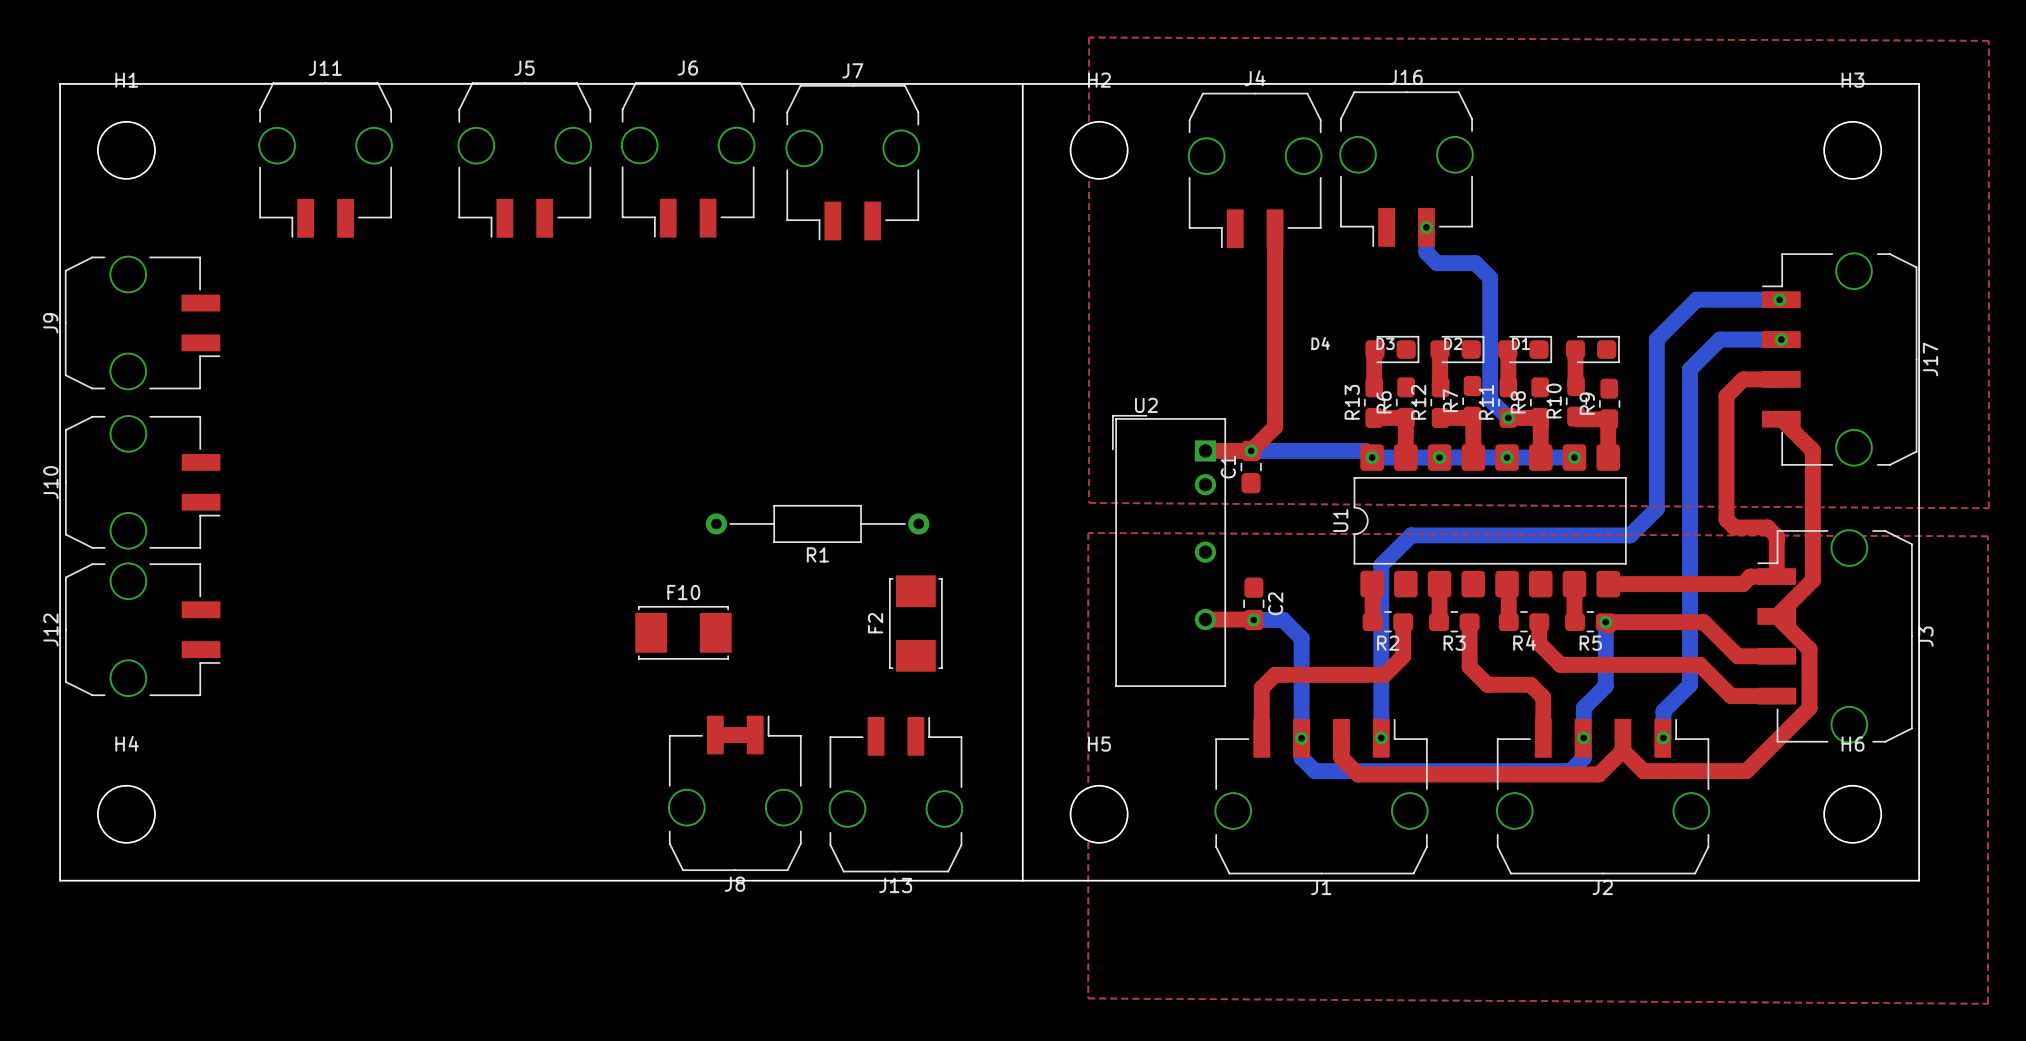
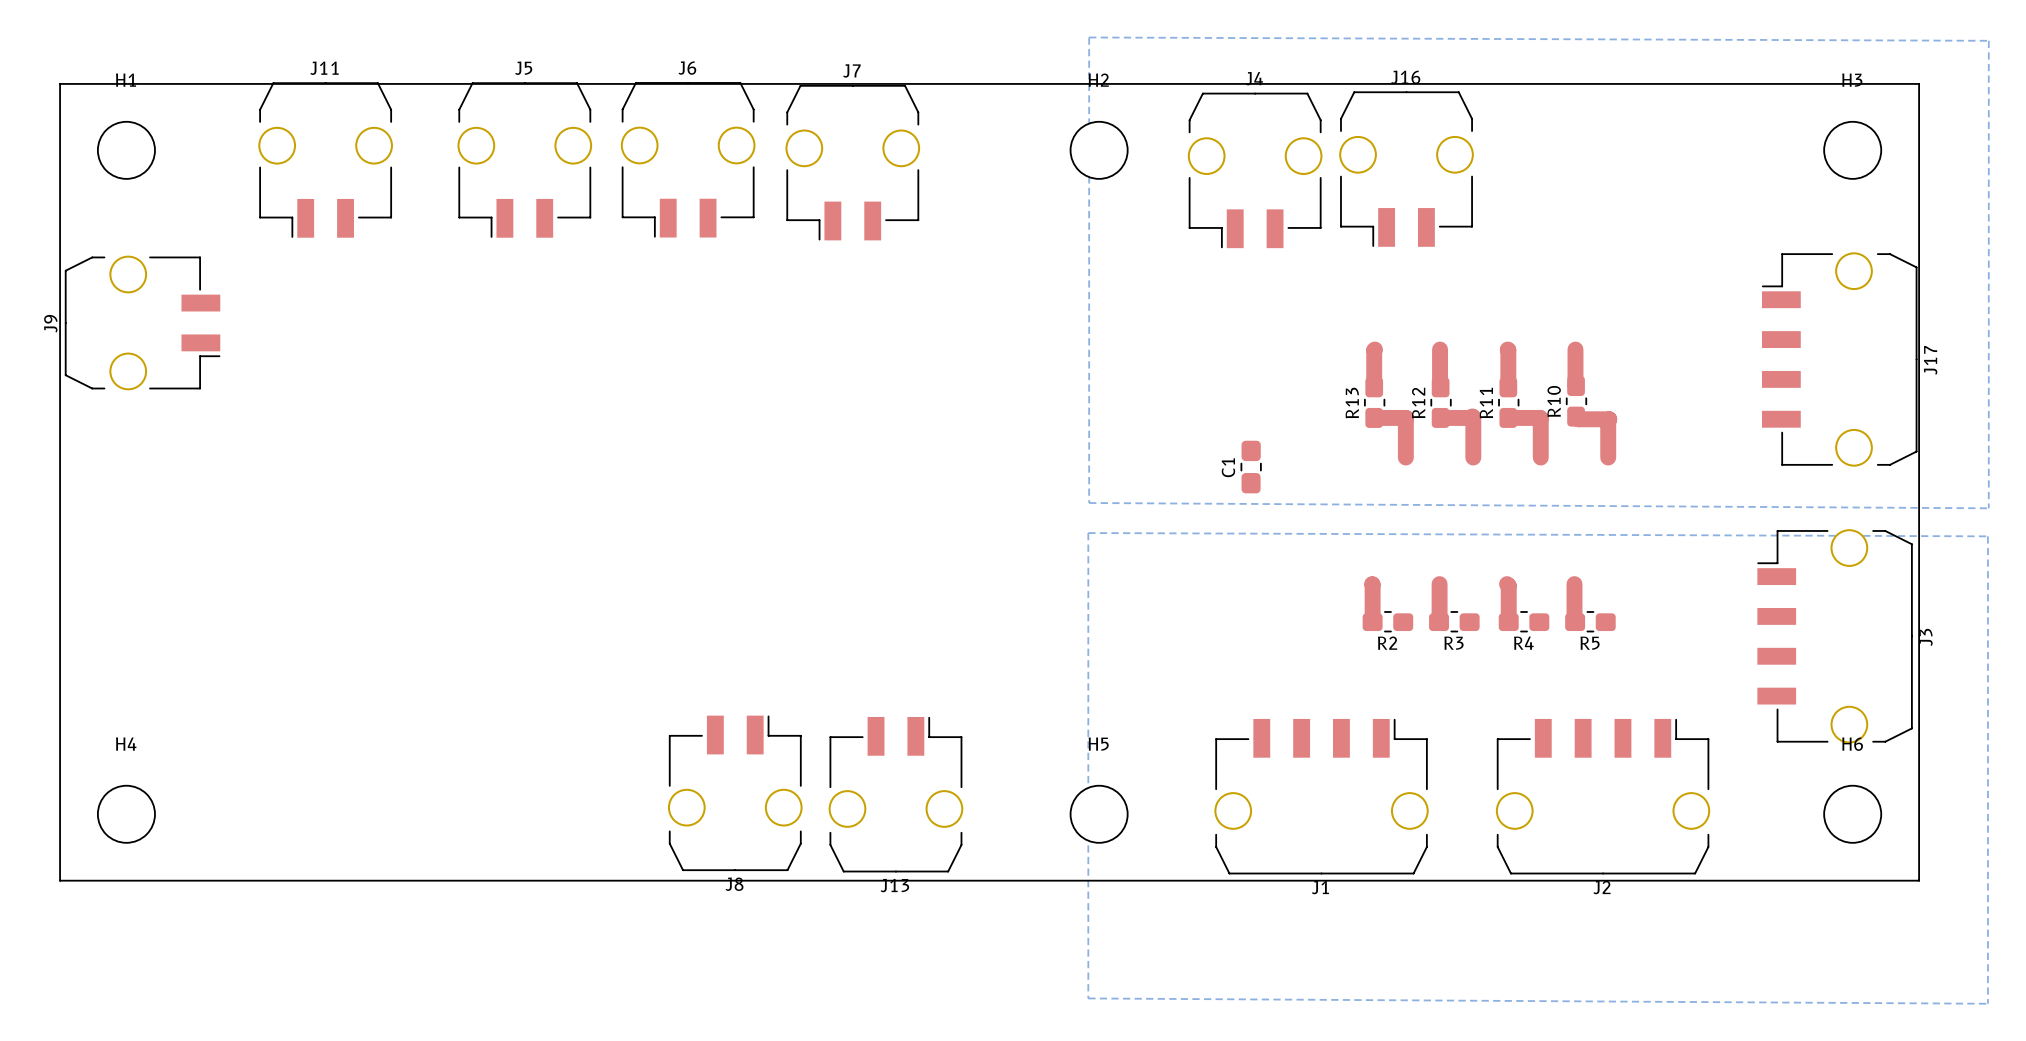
top zone outline: (1089, 37) (1988, 40) (1988, 508) (1089, 502) (1089, 37) -> none
board edge: (1022, 83) (1022, 880) -> none
bottom track: (1426, 227) (1426, 252) (1437, 263) (1475, 263) (1490, 277) (1490, 399) (1508, 417) -> none
via: (1426, 227) -> none
top track: (1275, 228) (1275, 427) (1251, 450) (1205, 450) -> none
bottom track: (1779, 299) (1696, 299) (1656, 339) (1656, 508) (1630, 535) (1411, 535) (1381, 565) (1381, 737) -> none
via: (1779, 299) -> none
bottom track: (1781, 339) (1719, 339) (1690, 369) (1690, 684) (1663, 711) (1663, 737) -> none
via: (1781, 339) -> none
D4: (1392, 349) -> none
D3: (1457, 349) -> none
D2: (1525, 349) -> none
D1: (1592, 349) -> none
top track: (1781, 379) (1743, 379) (1726, 396) (1726, 519) (1734, 527) (1767, 527) (1777, 536) (1776, 576) (1750, 576) (1742, 584) (1608, 584) -> none
R7: (1472, 401) -> none
R6: (1406, 402) -> none
R8: (1540, 402) -> none
R9: (1609, 403) -> none
via: (1508, 417) -> none
top track: (1781, 419) (1812, 450) (1812, 580) (1776, 616) (1809, 649) (1809, 708) (1746, 771) (1643, 771) (1622, 750) -> none
bottom track: (1251, 450) (1365, 450) (1372, 457) (1574, 457) -> none
via: (1251, 450) -> none
via: (1372, 457) -> none
via: (1439, 457) -> none
via: (1507, 457) -> none
via: (1574, 457) -> none
J10: (142, 482) -> none
U1: (1490, 520) -> none
R1: (817, 523) -> none
top zone outline: (1088, 533) (1987, 536) (1987, 1003) (1088, 998) (1088, 533) -> none
U2: (1169, 550) -> none
C2: (1253, 603) -> none
top track: (1205, 619) (1253, 619) -> none
bottom track: (1253, 619) (1283, 619) (1301, 638) (1301, 757) (1314, 771) (1570, 771) (1583, 757) (1583, 708) (1605, 686) (1605, 622) -> none
via: (1253, 619) -> none
top track: (1403, 622) (1403, 656) (1384, 674) (1275, 674) (1261, 688) (1261, 738) -> none
top track: (1469, 622) (1469, 666) (1487, 684) (1530, 684) (1543, 697) (1543, 738) -> none
top track: (1539, 622) (1539, 643) (1560, 664) (1699, 664) (1731, 696) (1776, 696) -> none
via: (1605, 622) -> none
F2: (915, 623) -> none
top track: (1609, 625) (1605, 622) (1703, 622) (1737, 656) (1776, 656) -> none
J12: (142, 629) -> none
F10: (683, 632) -> none
top track: (715, 735) (755, 735) -> none
via: (1381, 737) -> none
via: (1583, 737) -> none
via: (1663, 737) -> none
via: (1301, 738) -> none
top track: (1341, 738) (1341, 757) (1358, 774) (1599, 774) (1622, 750) -> none

